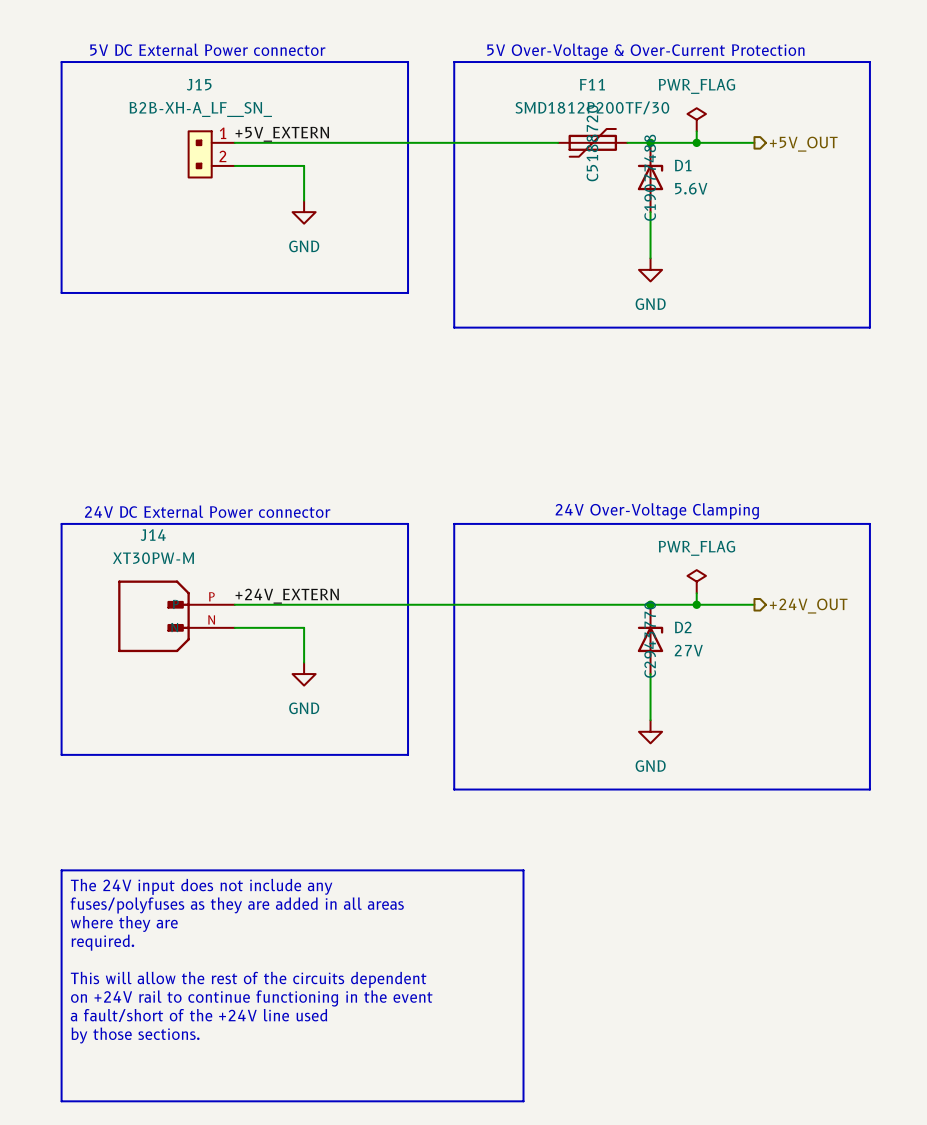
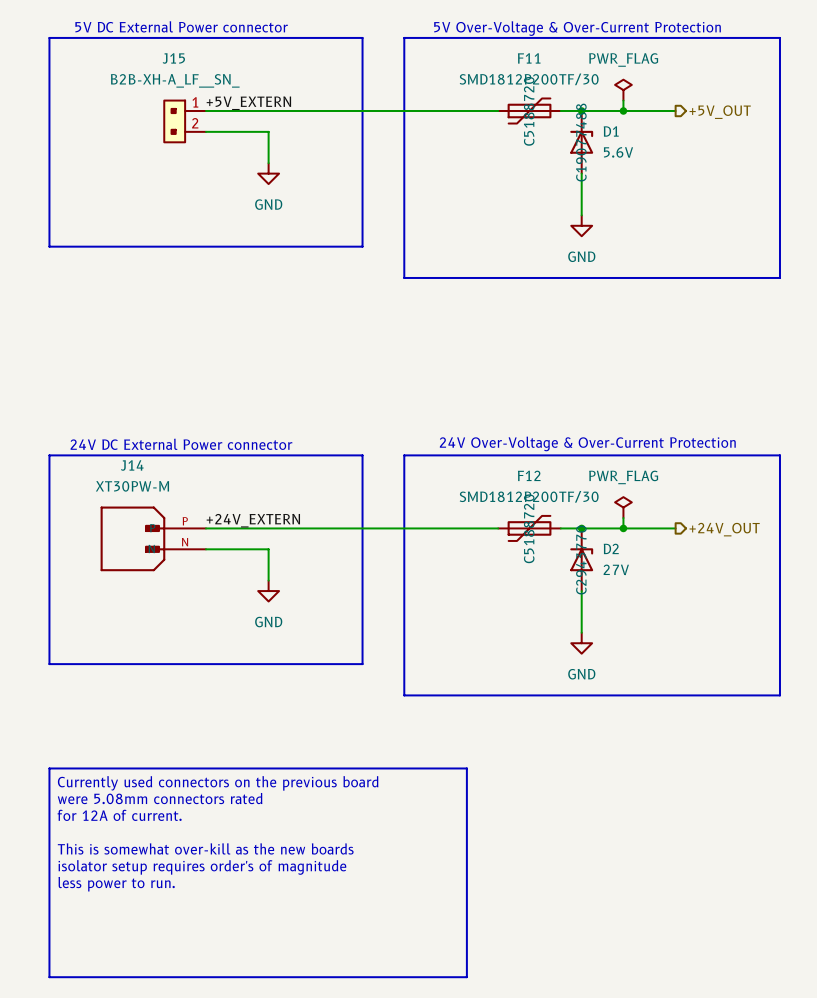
text: 24V Over-Voltage Clamping (657, 511) -> 24V Over-Voltage & Over-Current Protection (587, 443)
F12: none -> SMD1812P200TF/30 (529, 528)
text: The 24V input does not include any (201, 886) -> Currently used connectors on the previous board (218, 783)
text: fuses/polyfuses as they are added in all areas (237, 905) -> were 5.08mm connectors rated (160, 798)
text: where they are (124, 923) -> for 12A of current. (119, 815)
text: required. (102, 942) -> none
text: none -> This is somewhat over-kill as the new boards (205, 848)
text: This will allow the rest of the circuits dependent (248, 979) -> isolator setup requires order's of magnitude (202, 867)
text: on +24V rail to continue functioning in the event (251, 998) -> less power to run. (116, 884)
text: a fault/short of the +24V line used (198, 1015) -> none
text: by those sections. (135, 1035) -> none

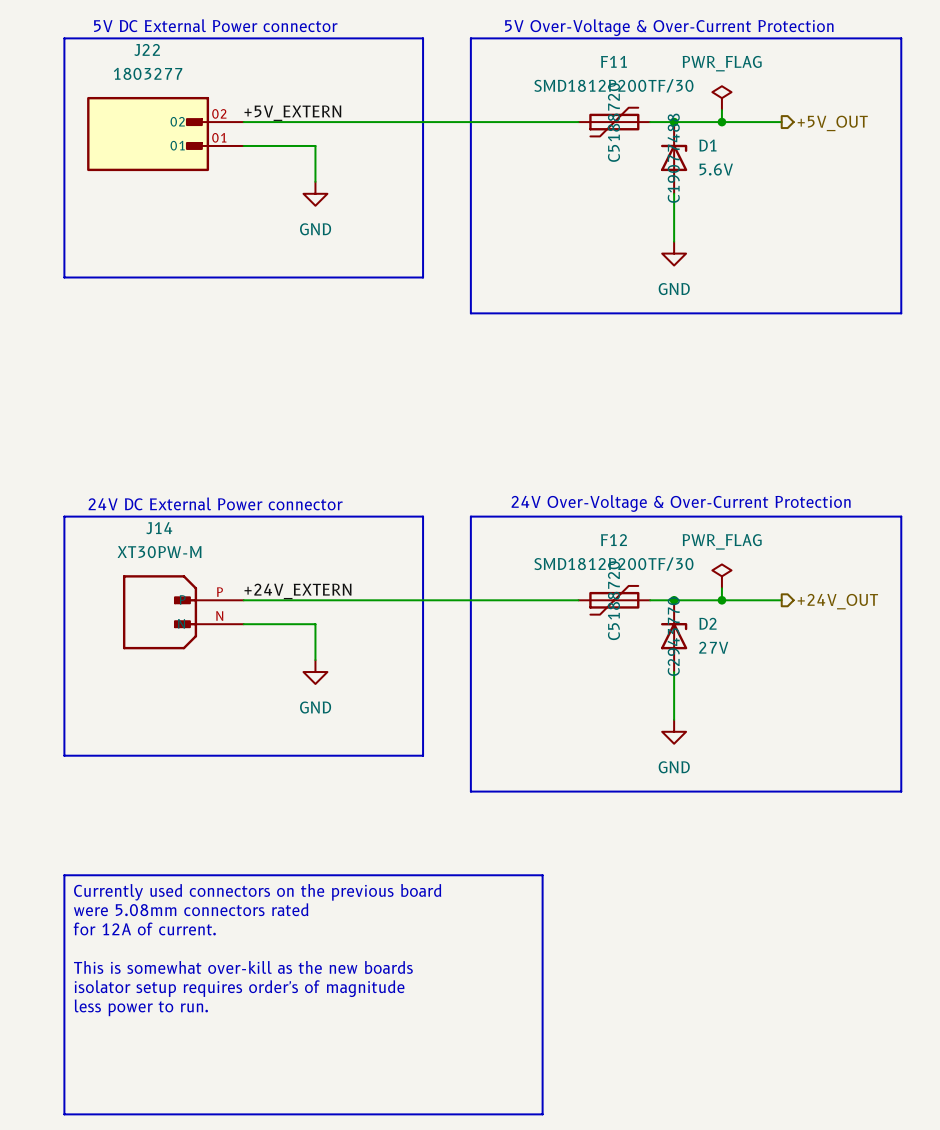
J22: none -> 1803277 (165, 134)
J15: B2B-XH-A_LF__SN_ (185, 121) -> none

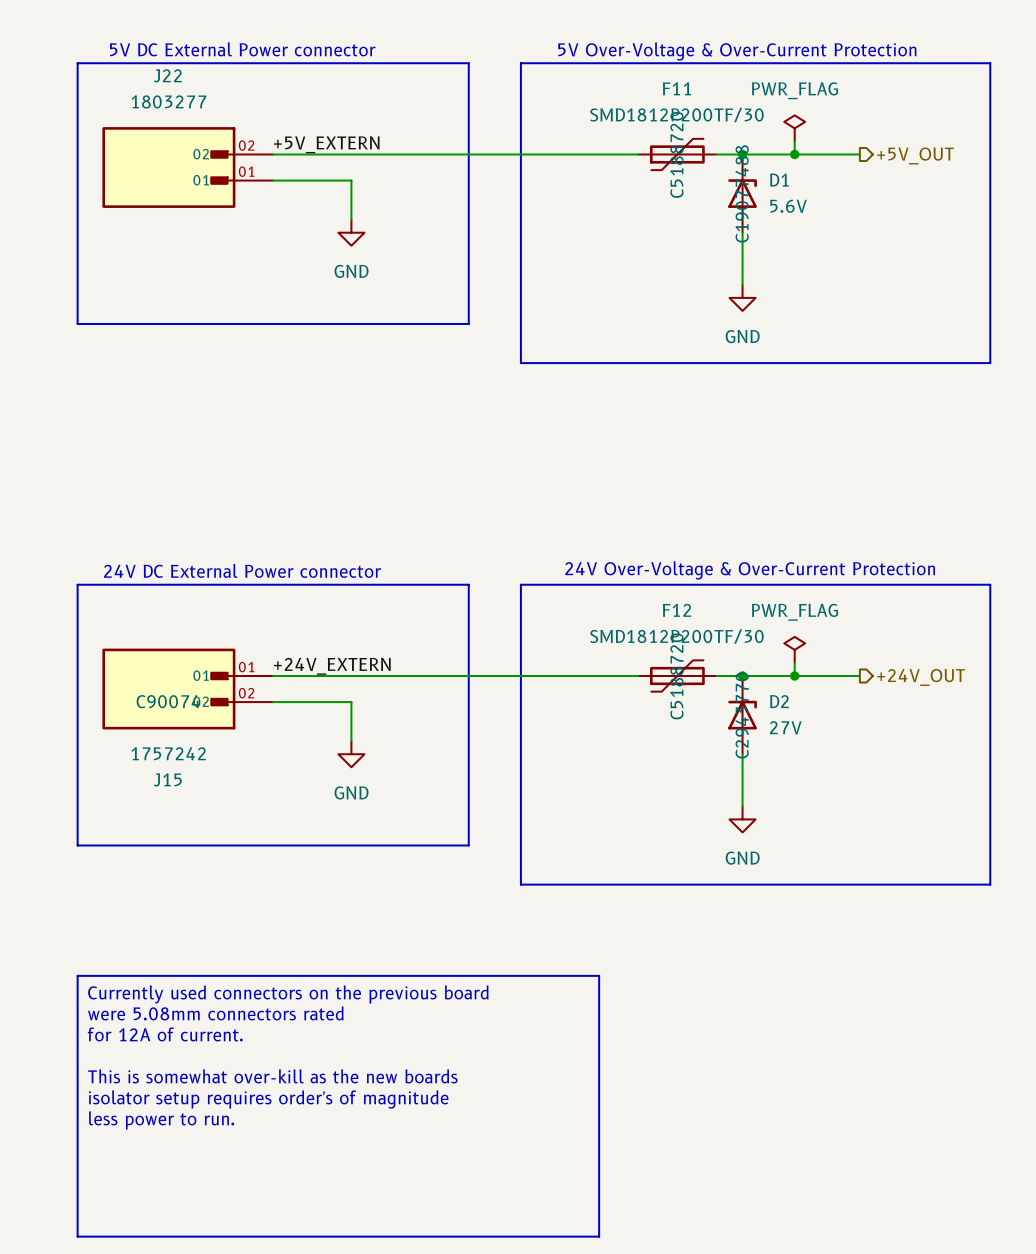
J15: none -> 1757242 (187, 689)
J14: XT30PW-M (183, 612) -> none

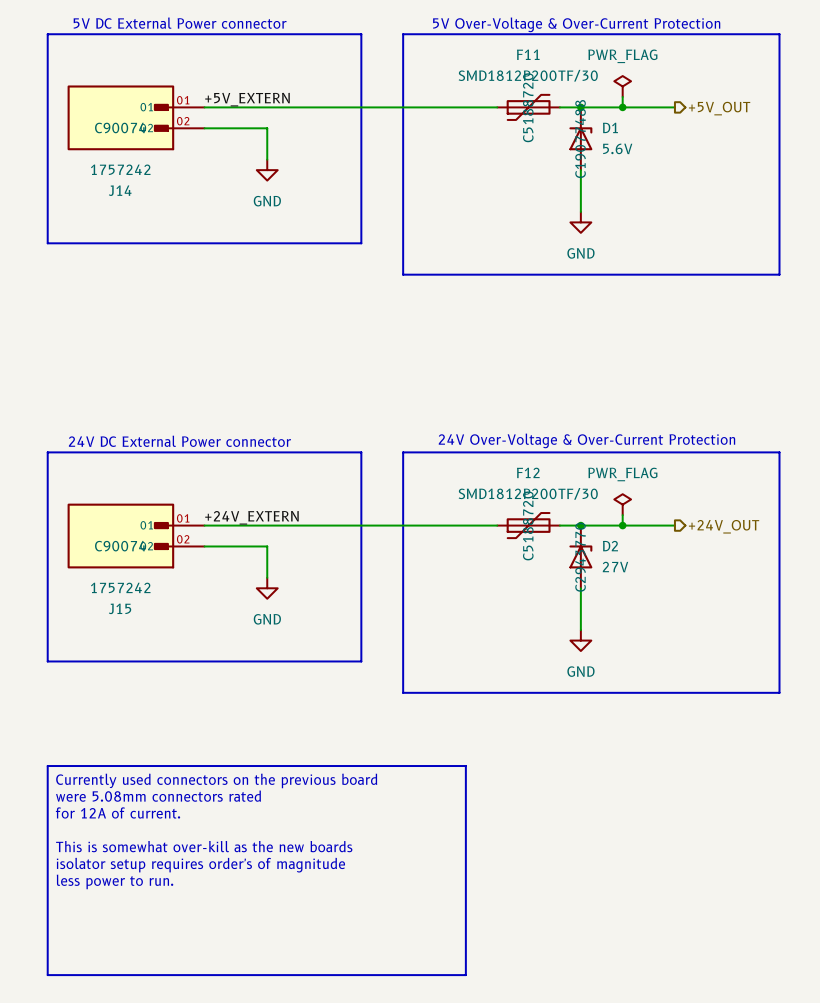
J22 name: J22 (167, 75) -> J14 (120, 190)
J22 value: 1803277 (168, 101) -> 1757242 (120, 169)
J22 flip: as is (168, 167) -> up-down (120, 117)
J22 text: none -> C90074 (120, 127)

